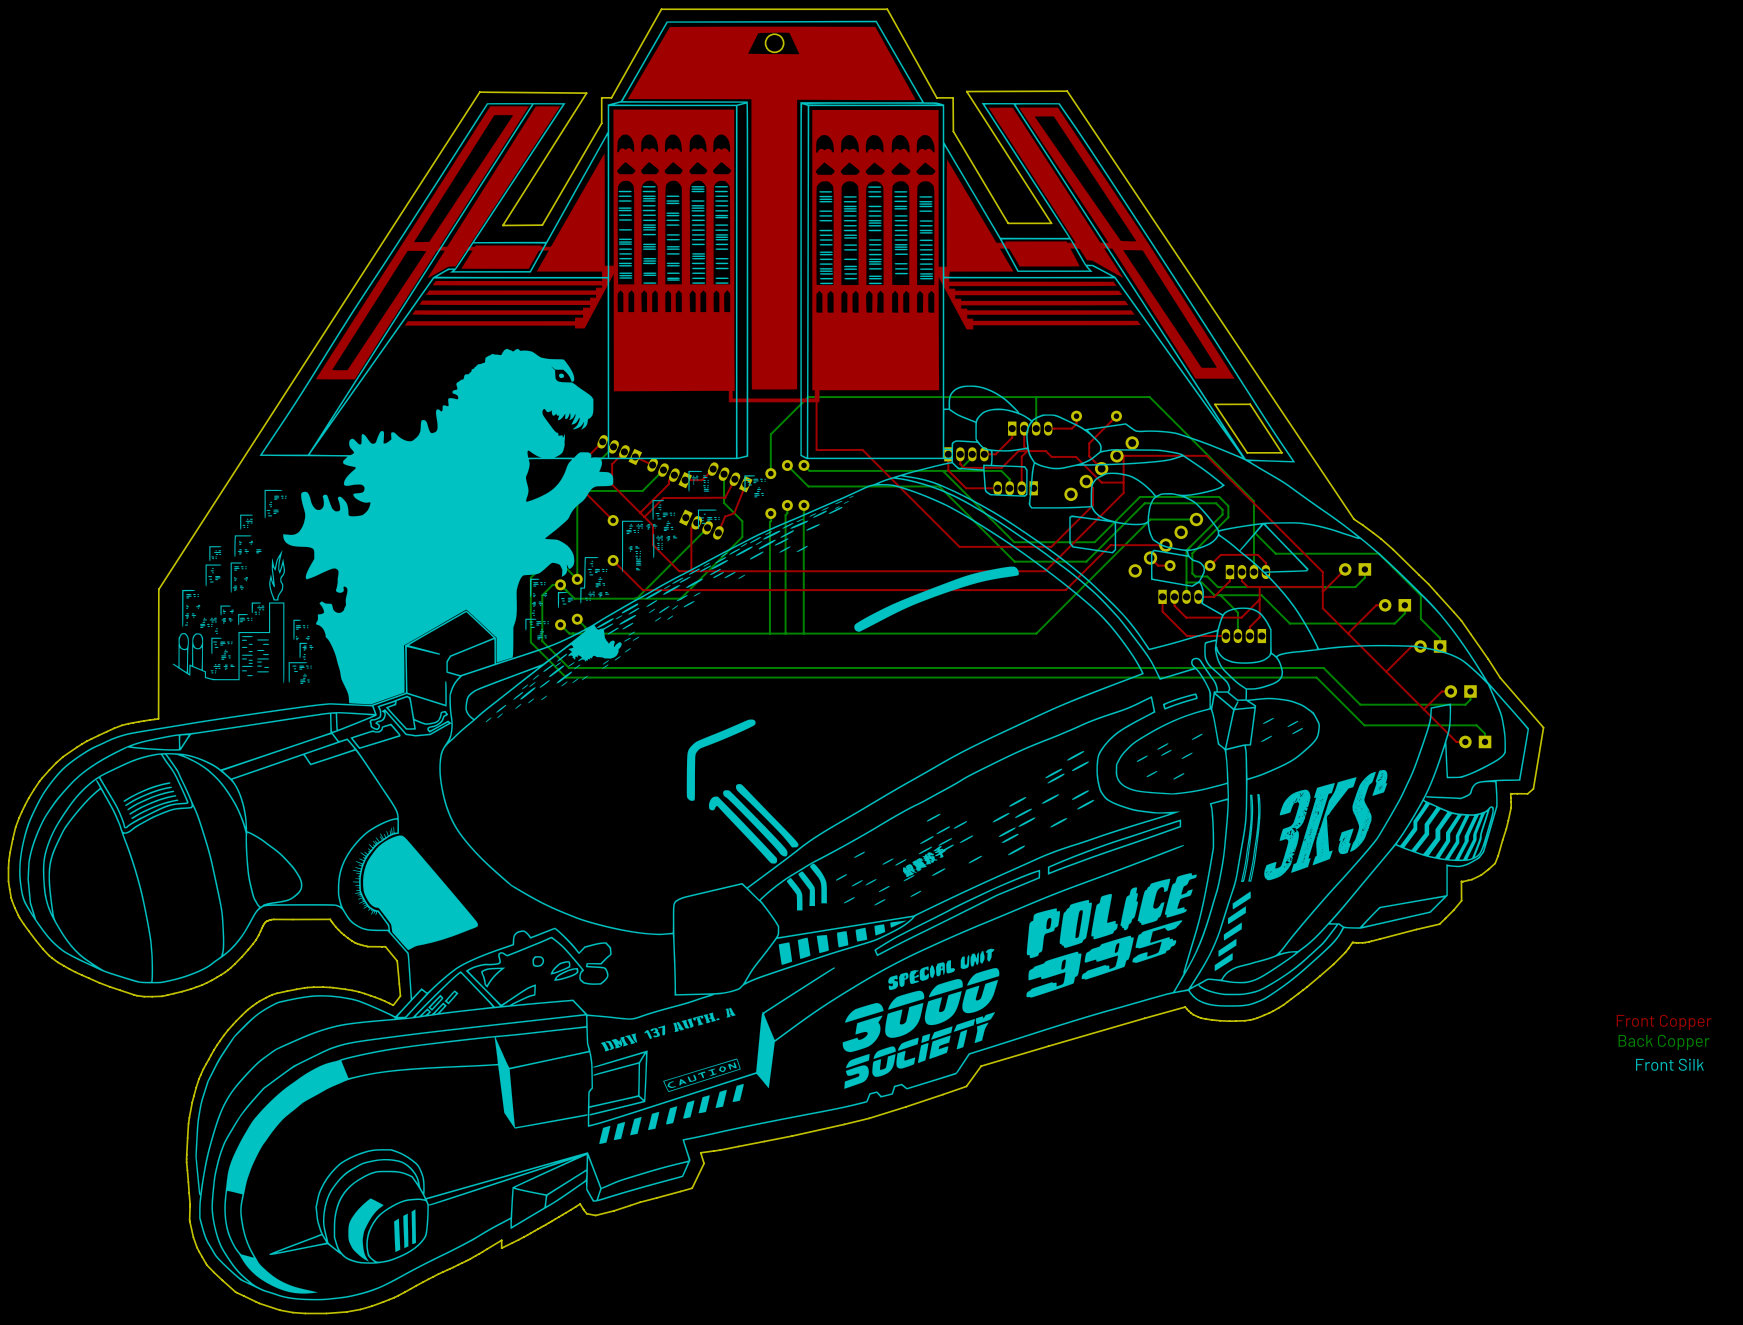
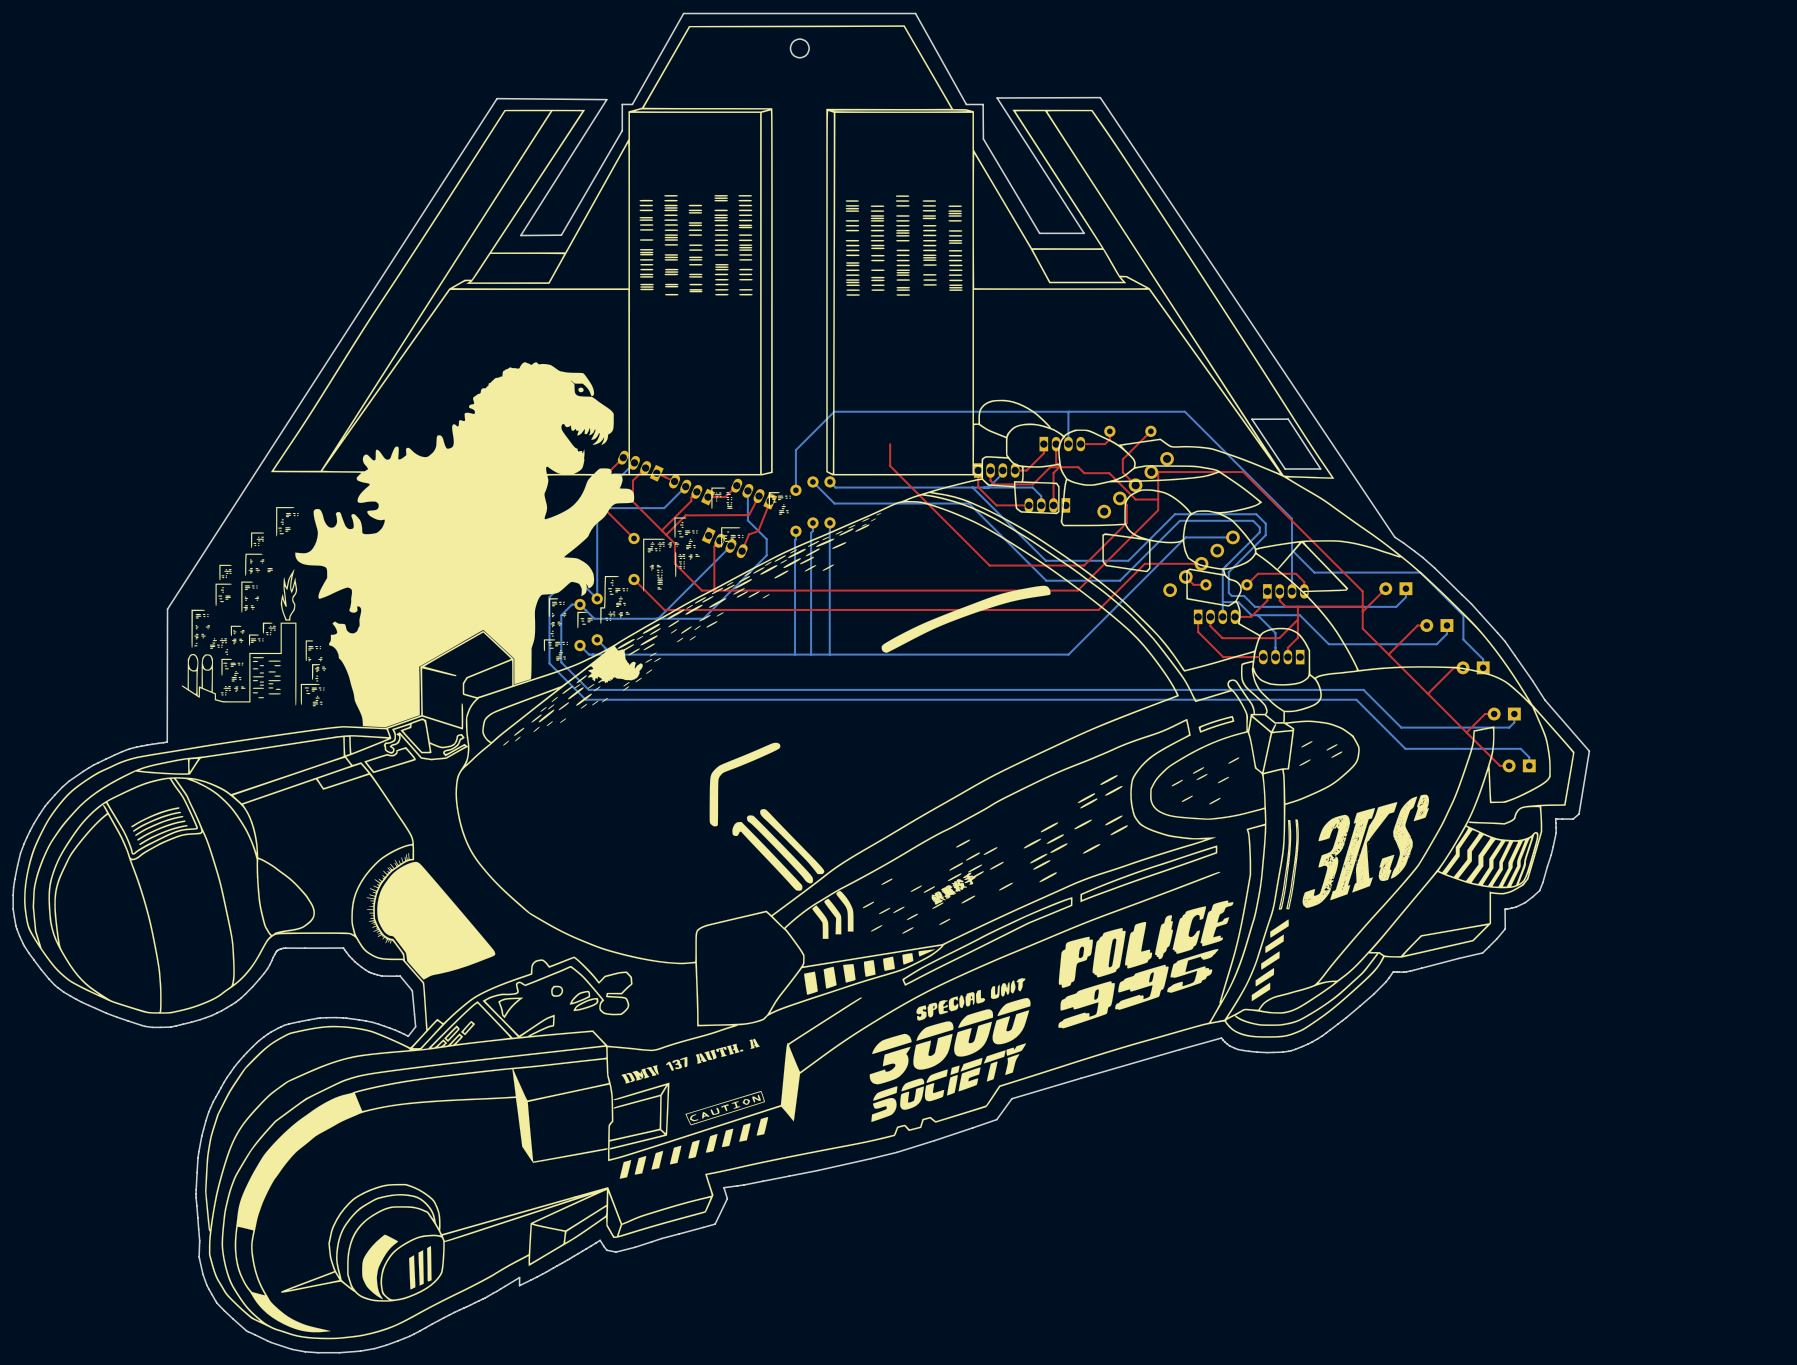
drawing: [316, 26, 1235, 403] -> none
top track: (816, 399) (816, 450) (862, 449) -> (890, 444) (890, 465)
text: Front Copper (1664, 1022) -> none
text: Back Copper (1664, 1042) -> none
text: Front Silk (1669, 1064) -> none

